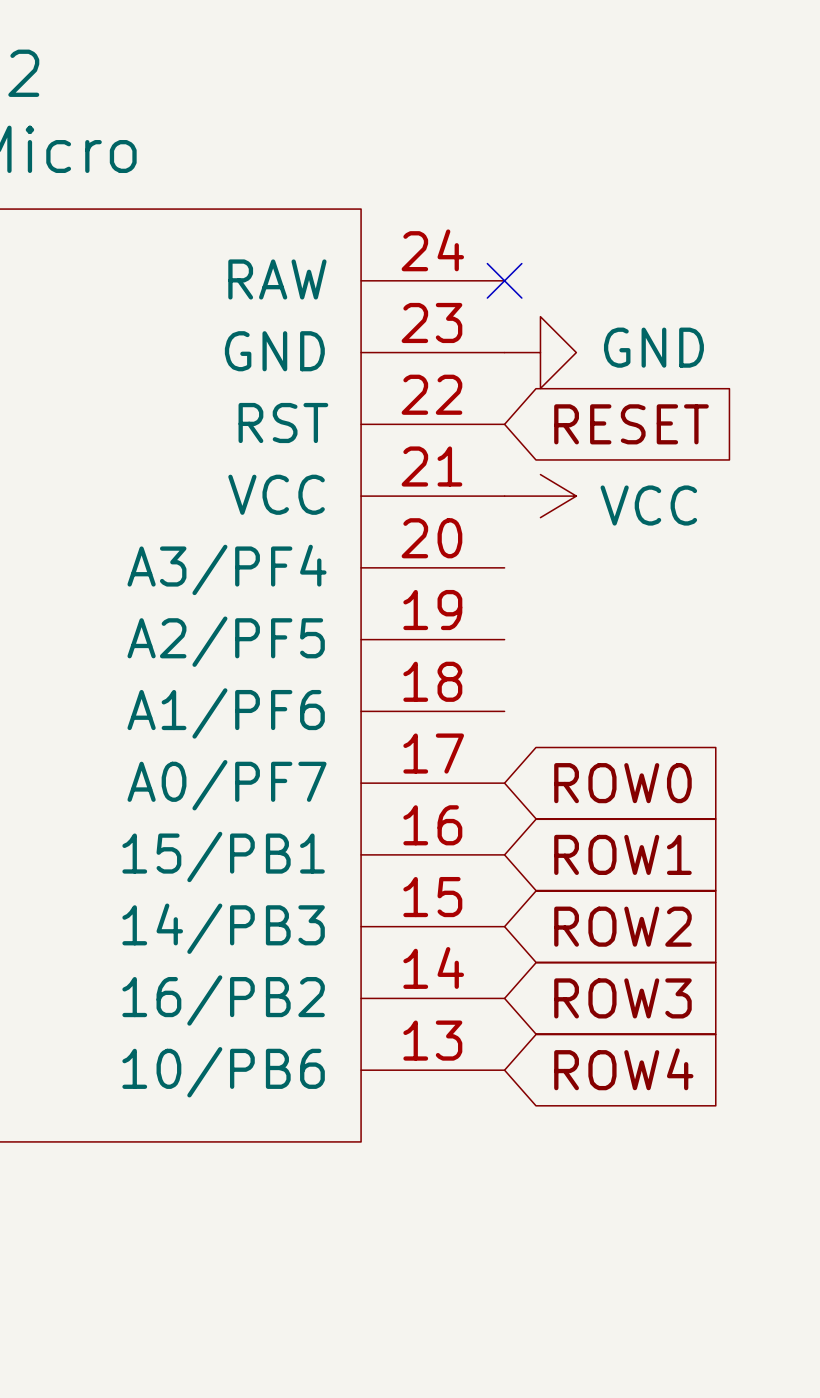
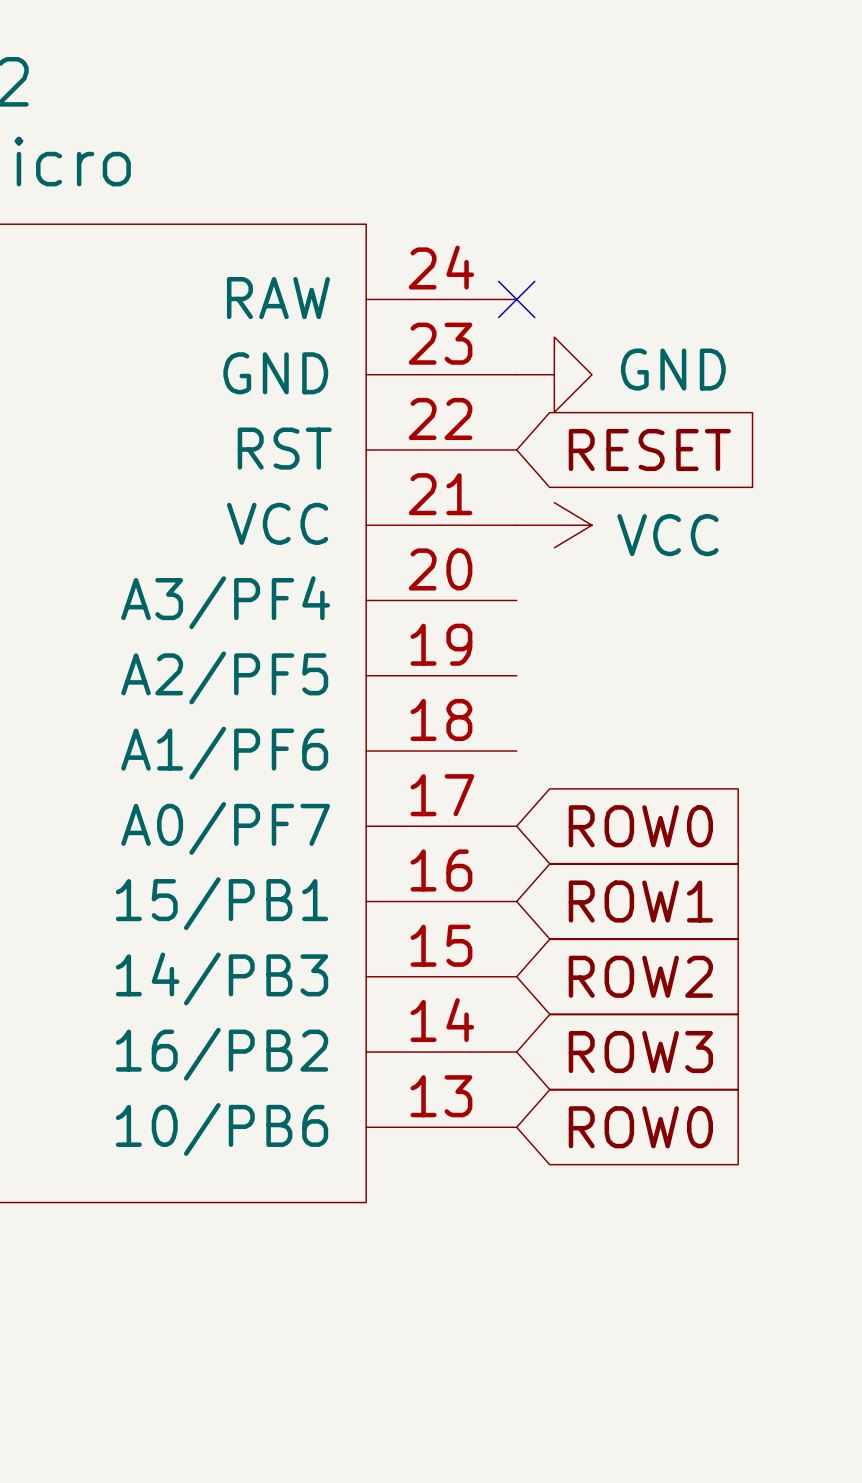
global label: ROW4 (623, 1069) -> ROW0 (640, 1127)

